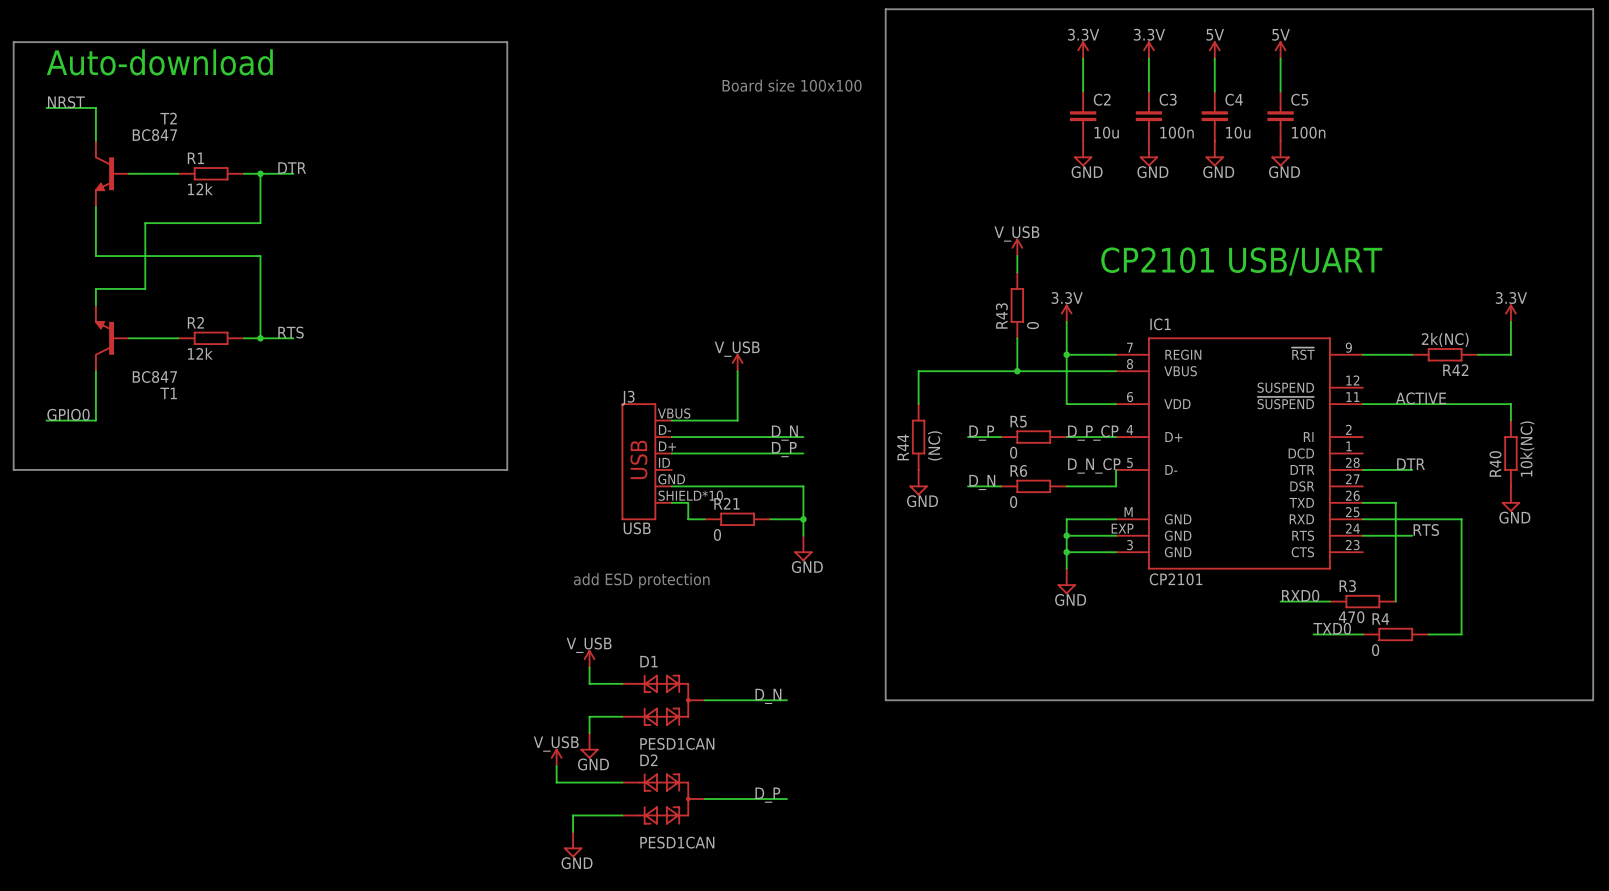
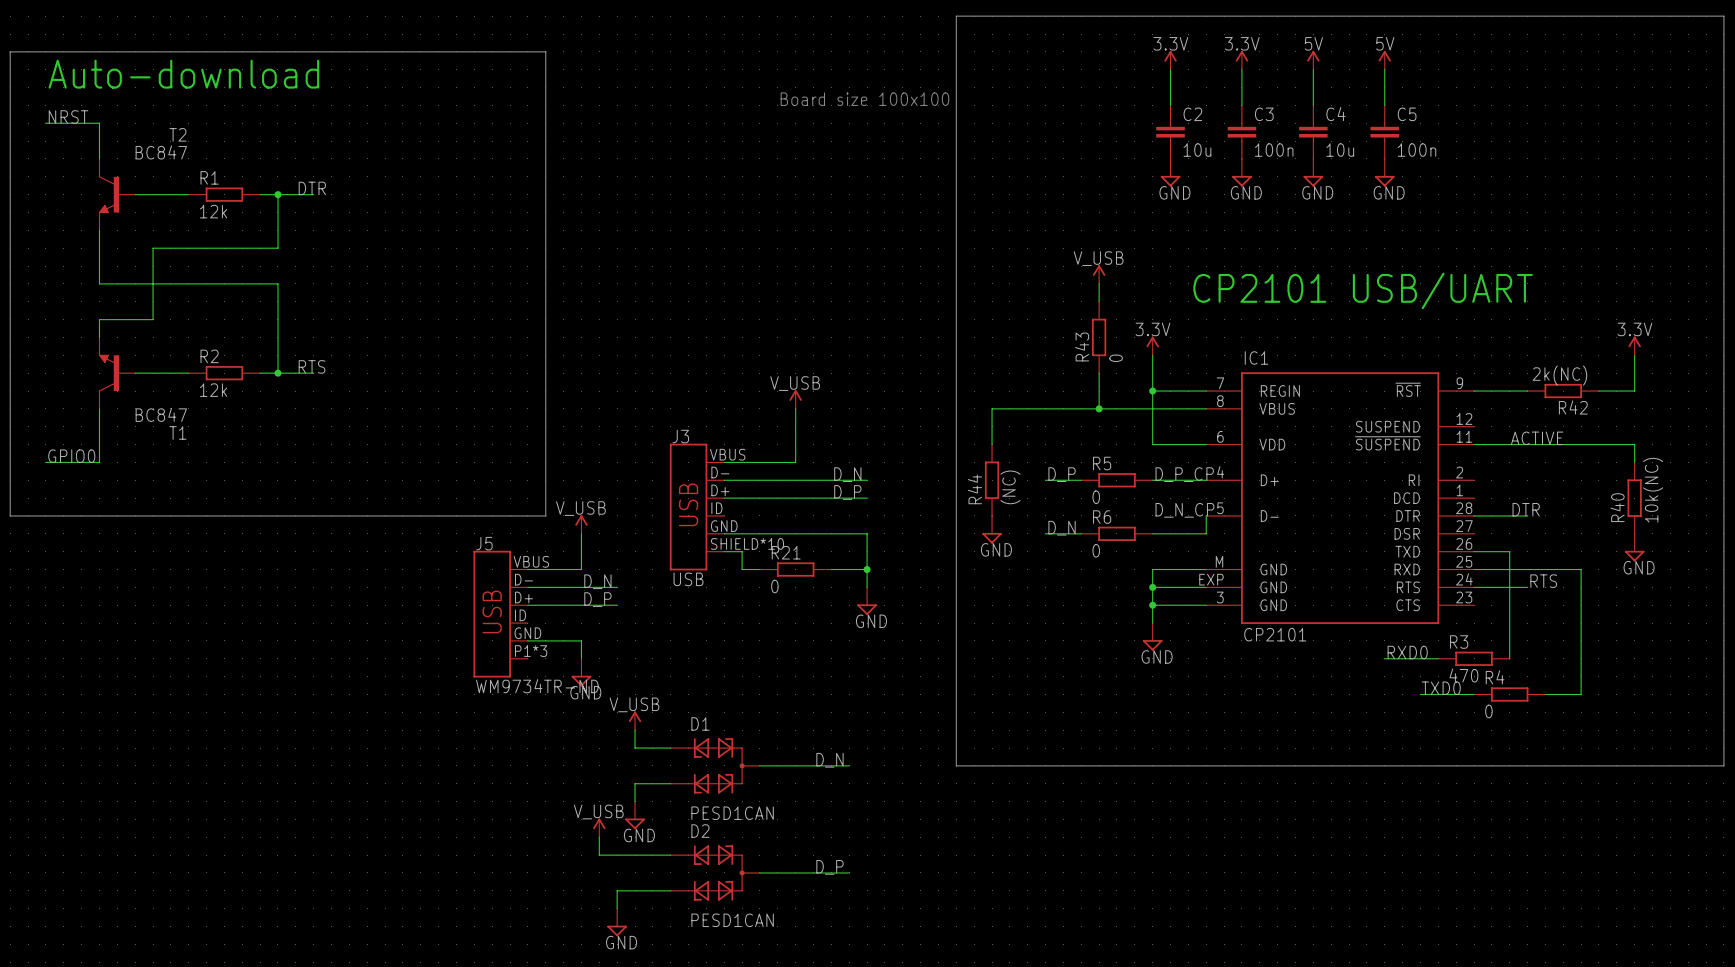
power symbol: none -> V_USB (581, 524)
wire: none -> (581, 533) (581, 569) (527, 569)
label: none -> D_N (597, 581)
wire: none -> (527, 587) (617, 587)
label: none -> D_P (597, 599)
wire: none -> (527, 605) (617, 605)
J5: none -> WM9734TR-ND (500, 614)
text: add ESD protection (641, 580) -> none
wire: none -> (527, 640) (581, 640) (581, 658)
power symbol: none -> GND (581, 672)

